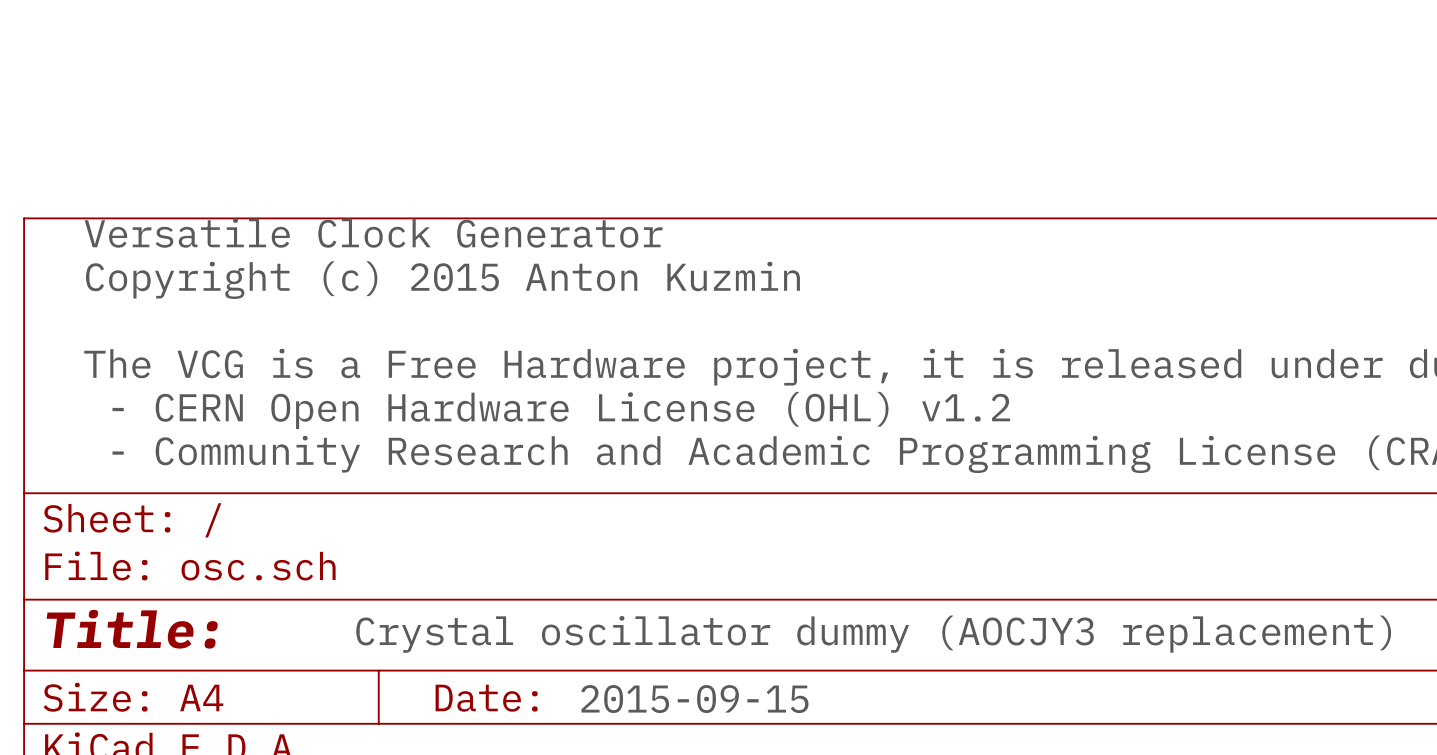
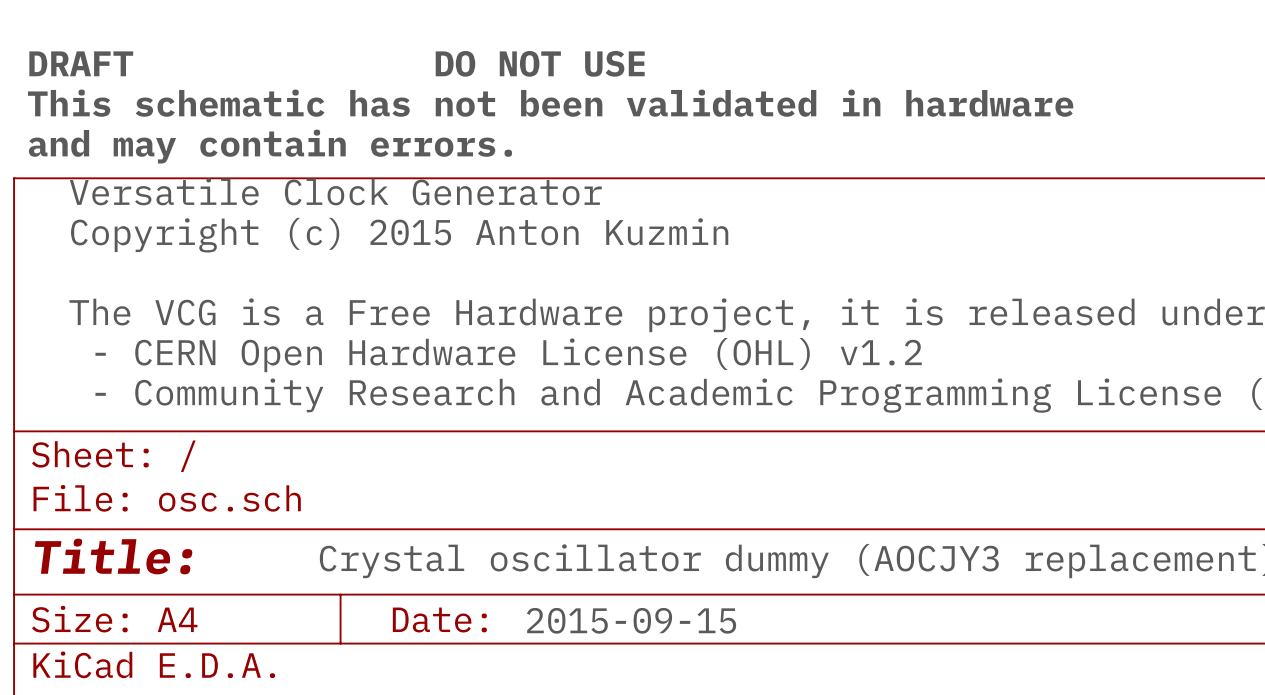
text: none -> DRAFT DO NOT USE (337, 63)
text: none -> This schematic has not been validated in hardware (550, 103)
text: none -> and may contain errors. (270, 146)

